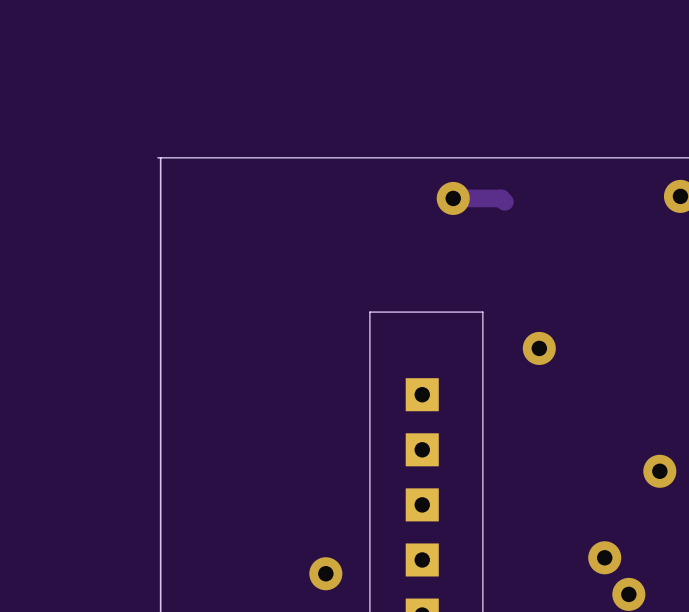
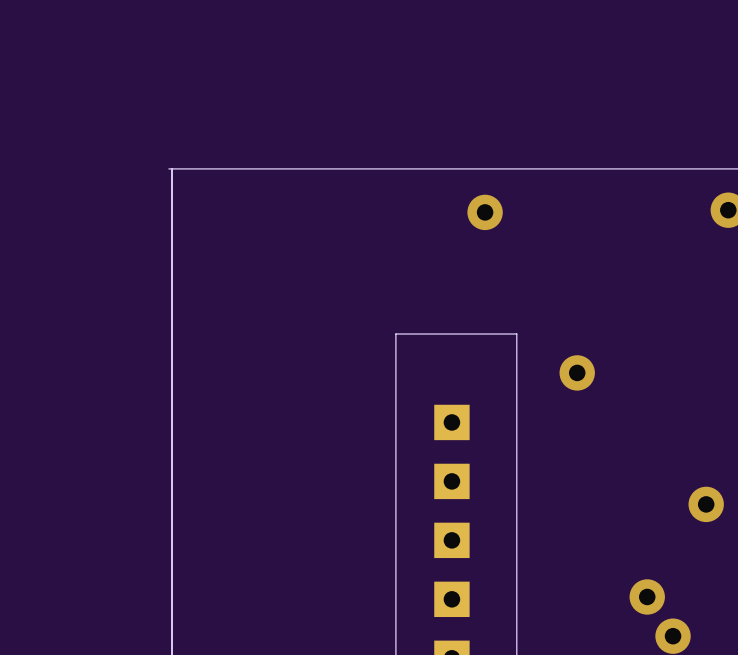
track: (453, 198) (501, 198) (504, 201) -> none
via: (325, 573) -> none

